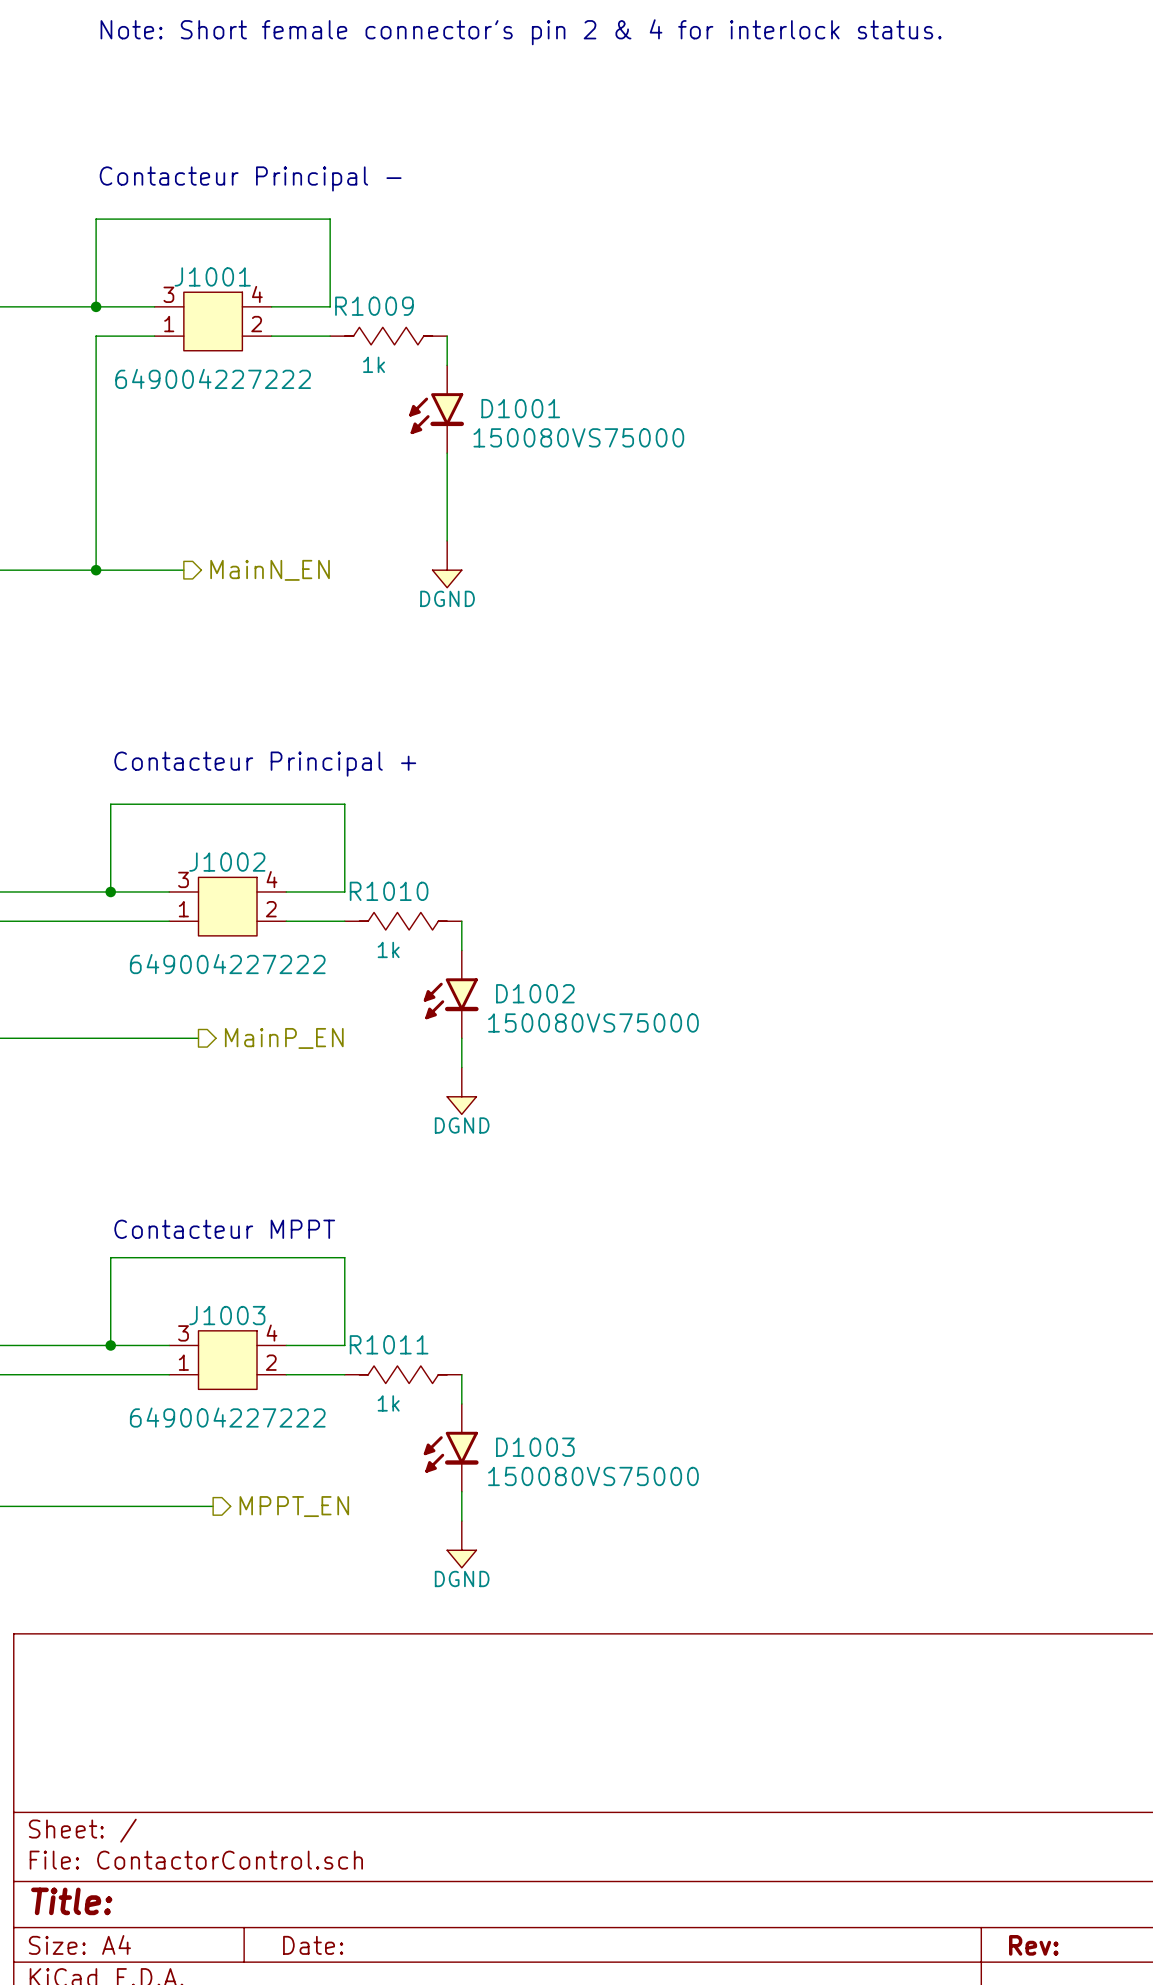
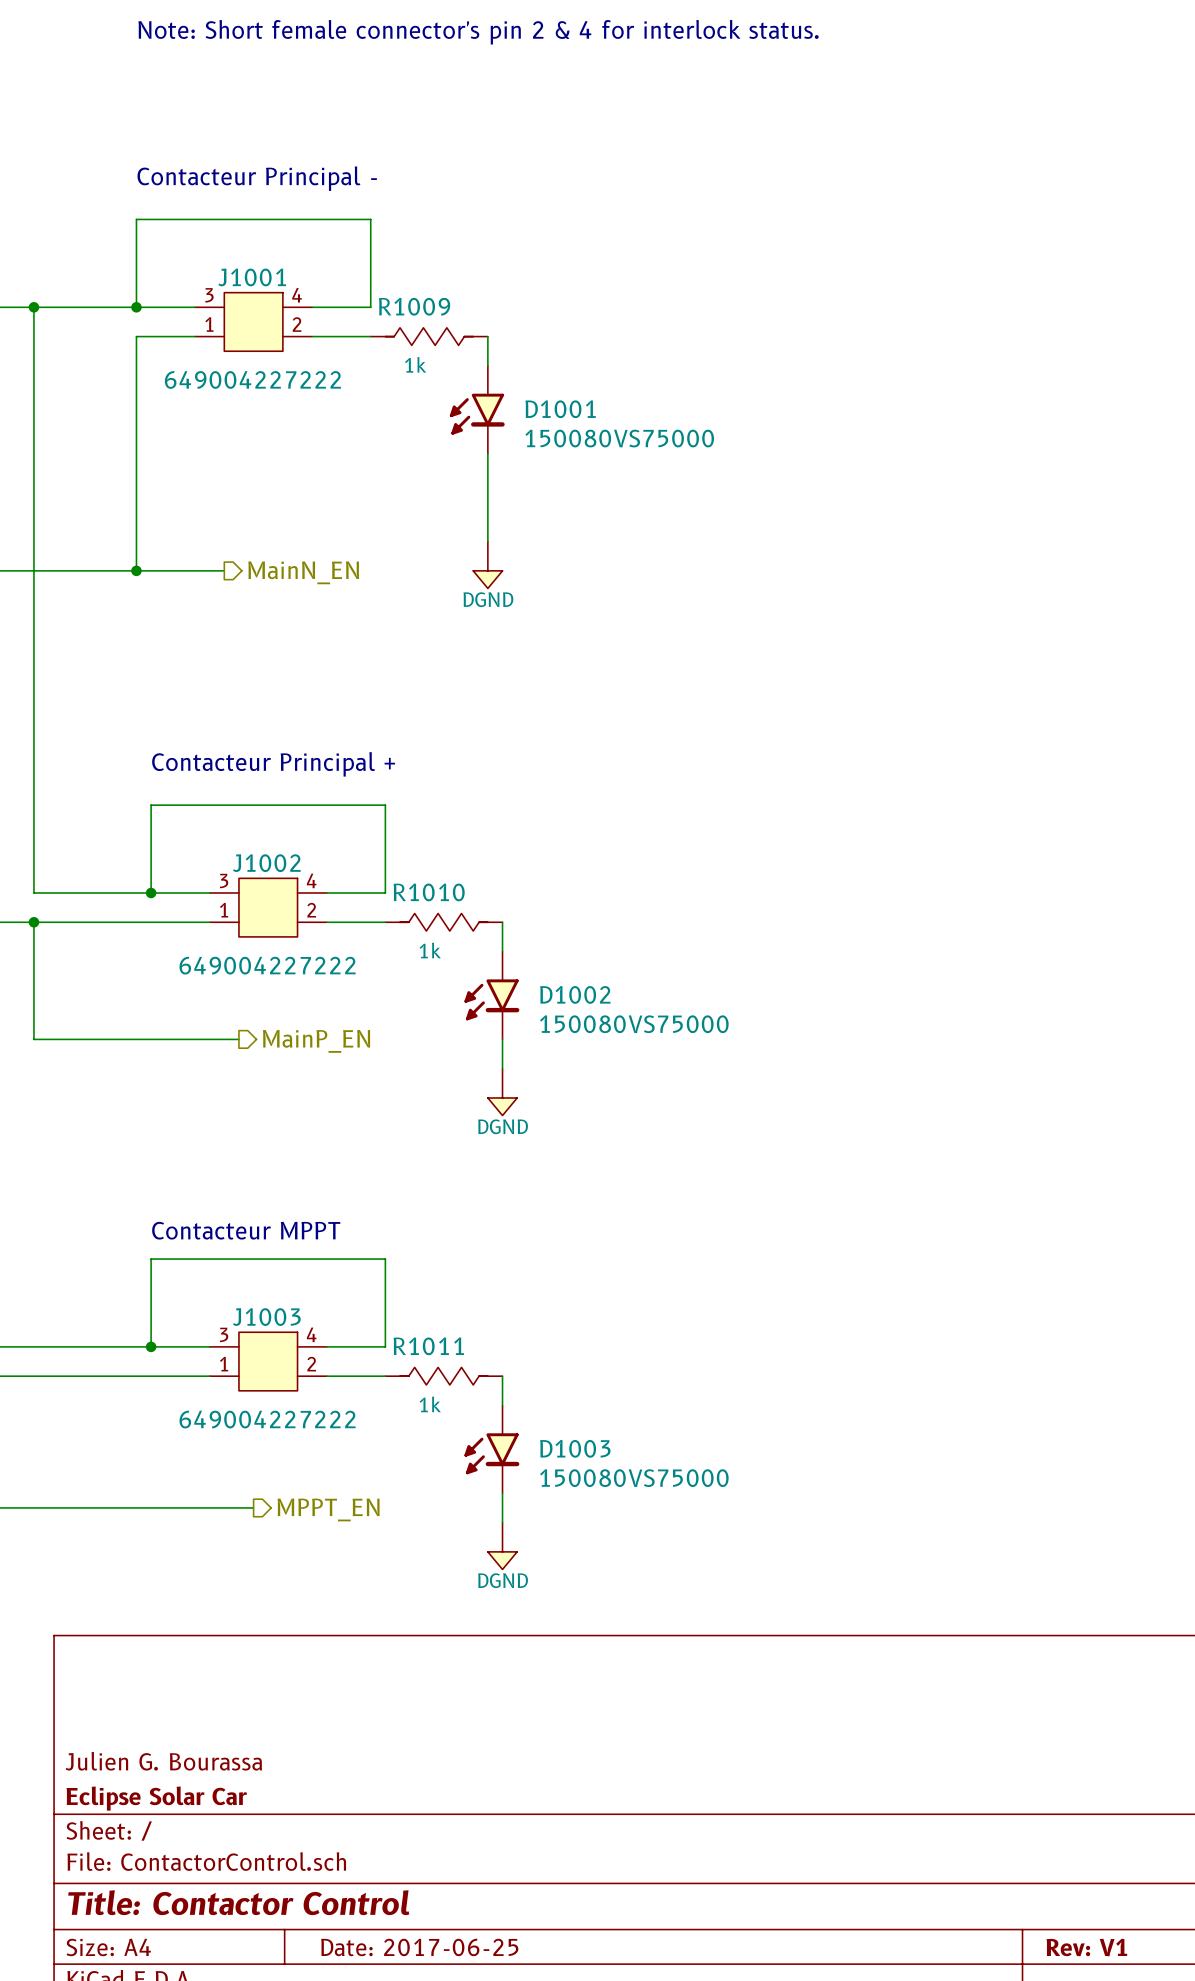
title block: none -> Julien G. Bourassa (163, 1761)
title block: none -> Eclipse Solar Car (156, 1798)
title block: Title: (71, 1901) -> Title: Contactor Control (238, 1902)
title block: Date: (313, 1945) -> Date: 2017-06-25 (419, 1947)
title block: Rev: (1033, 1945) -> Rev: V1 (1086, 1947)

